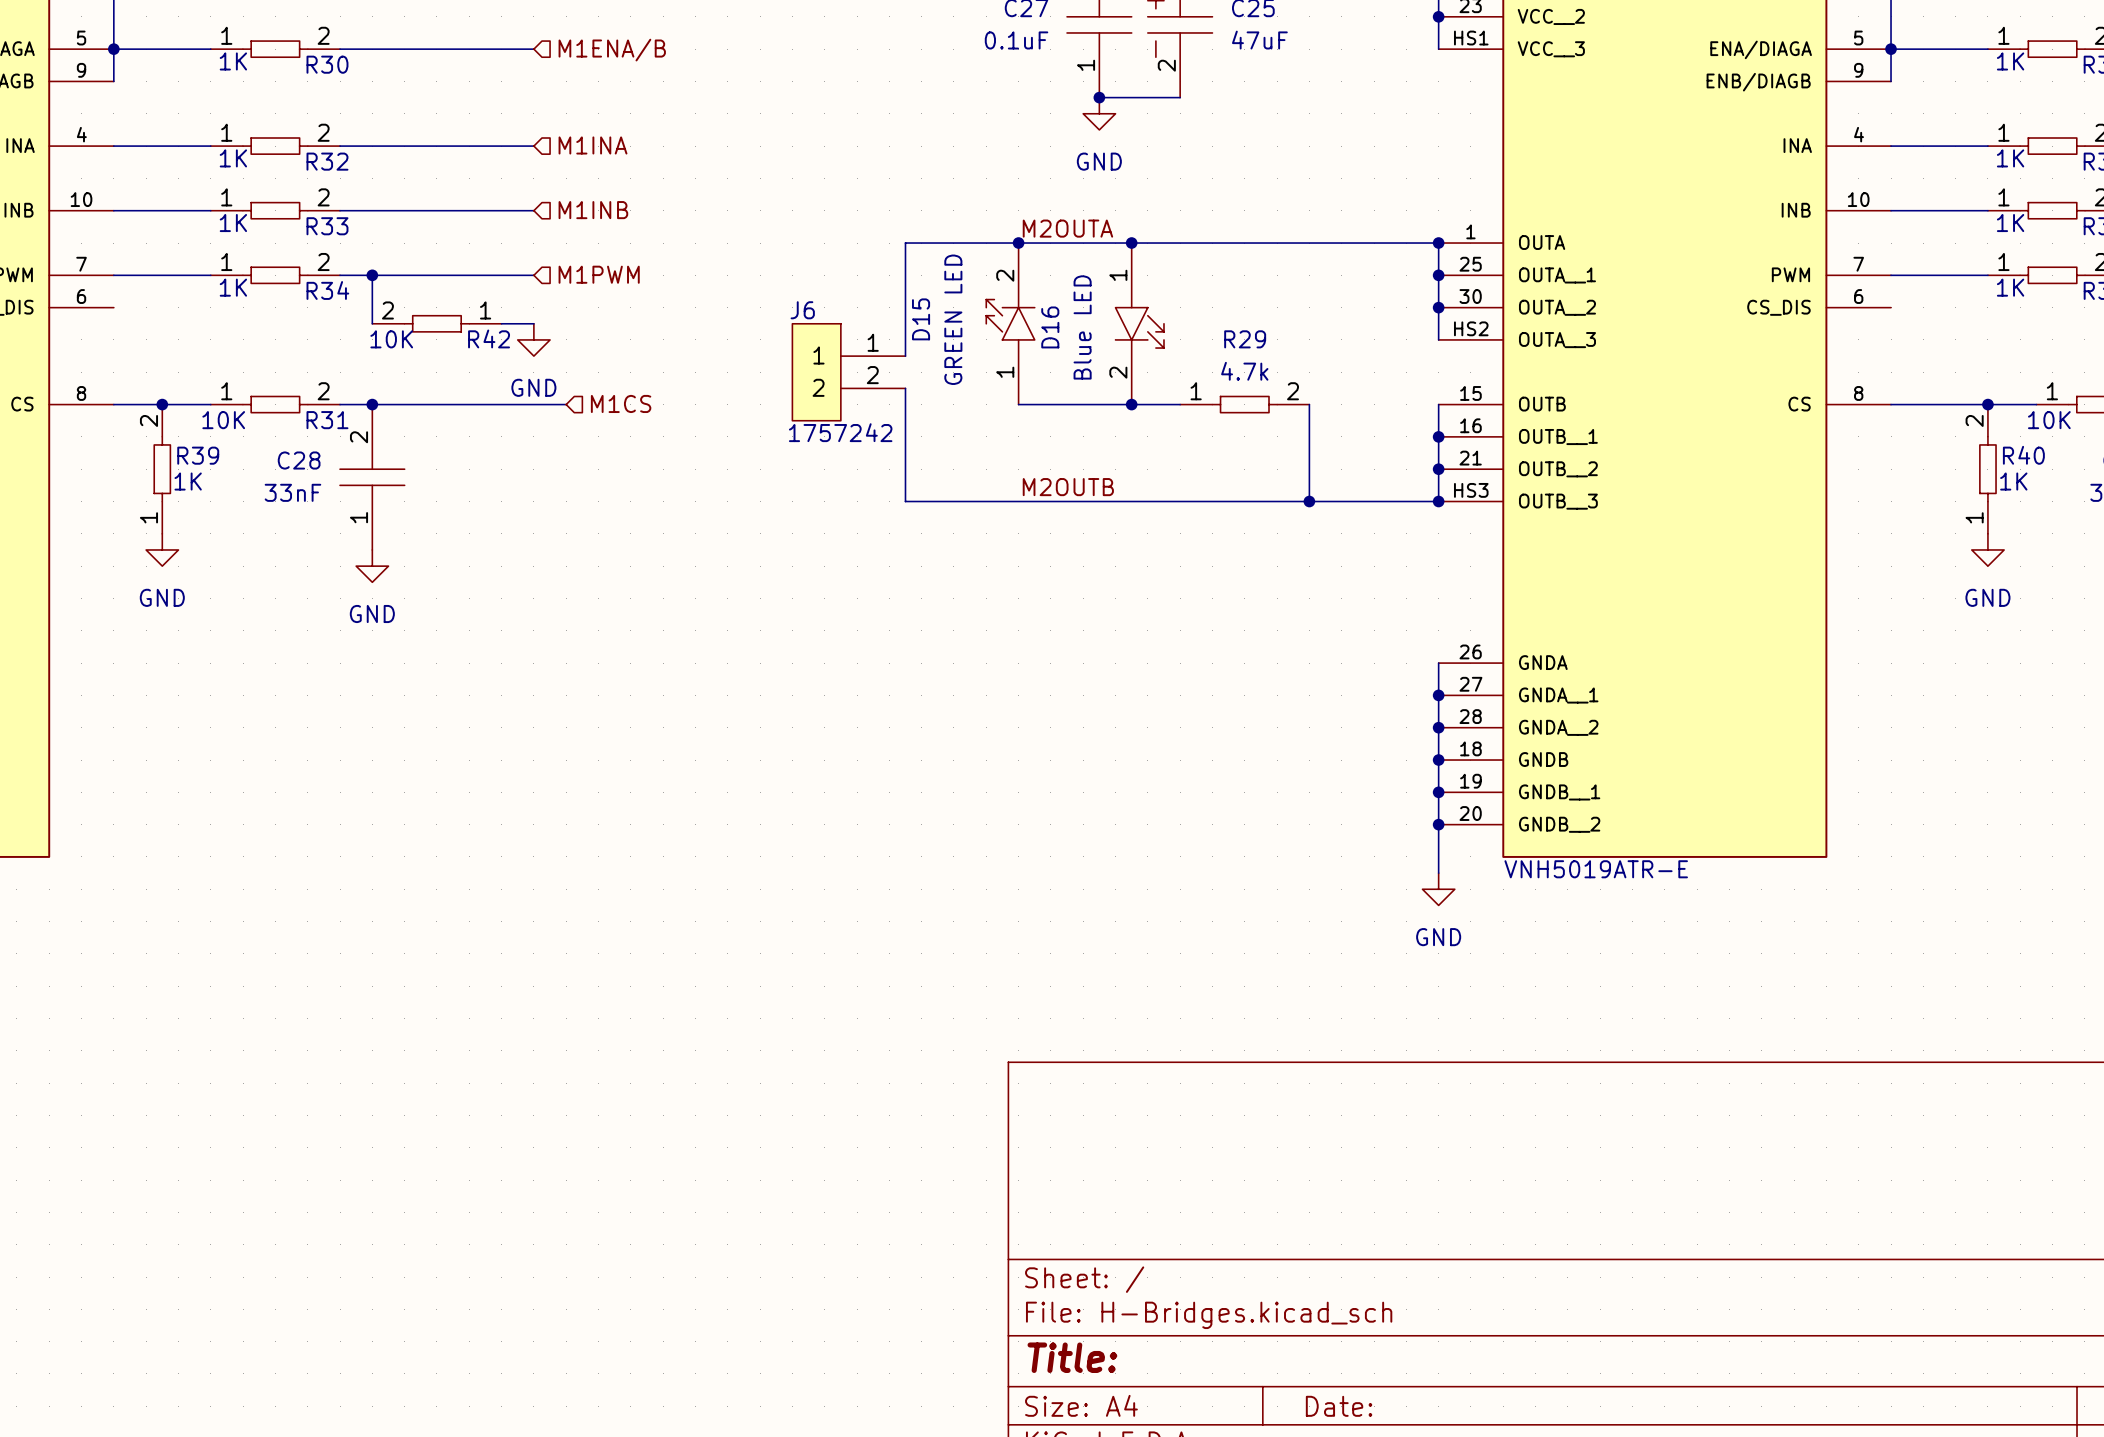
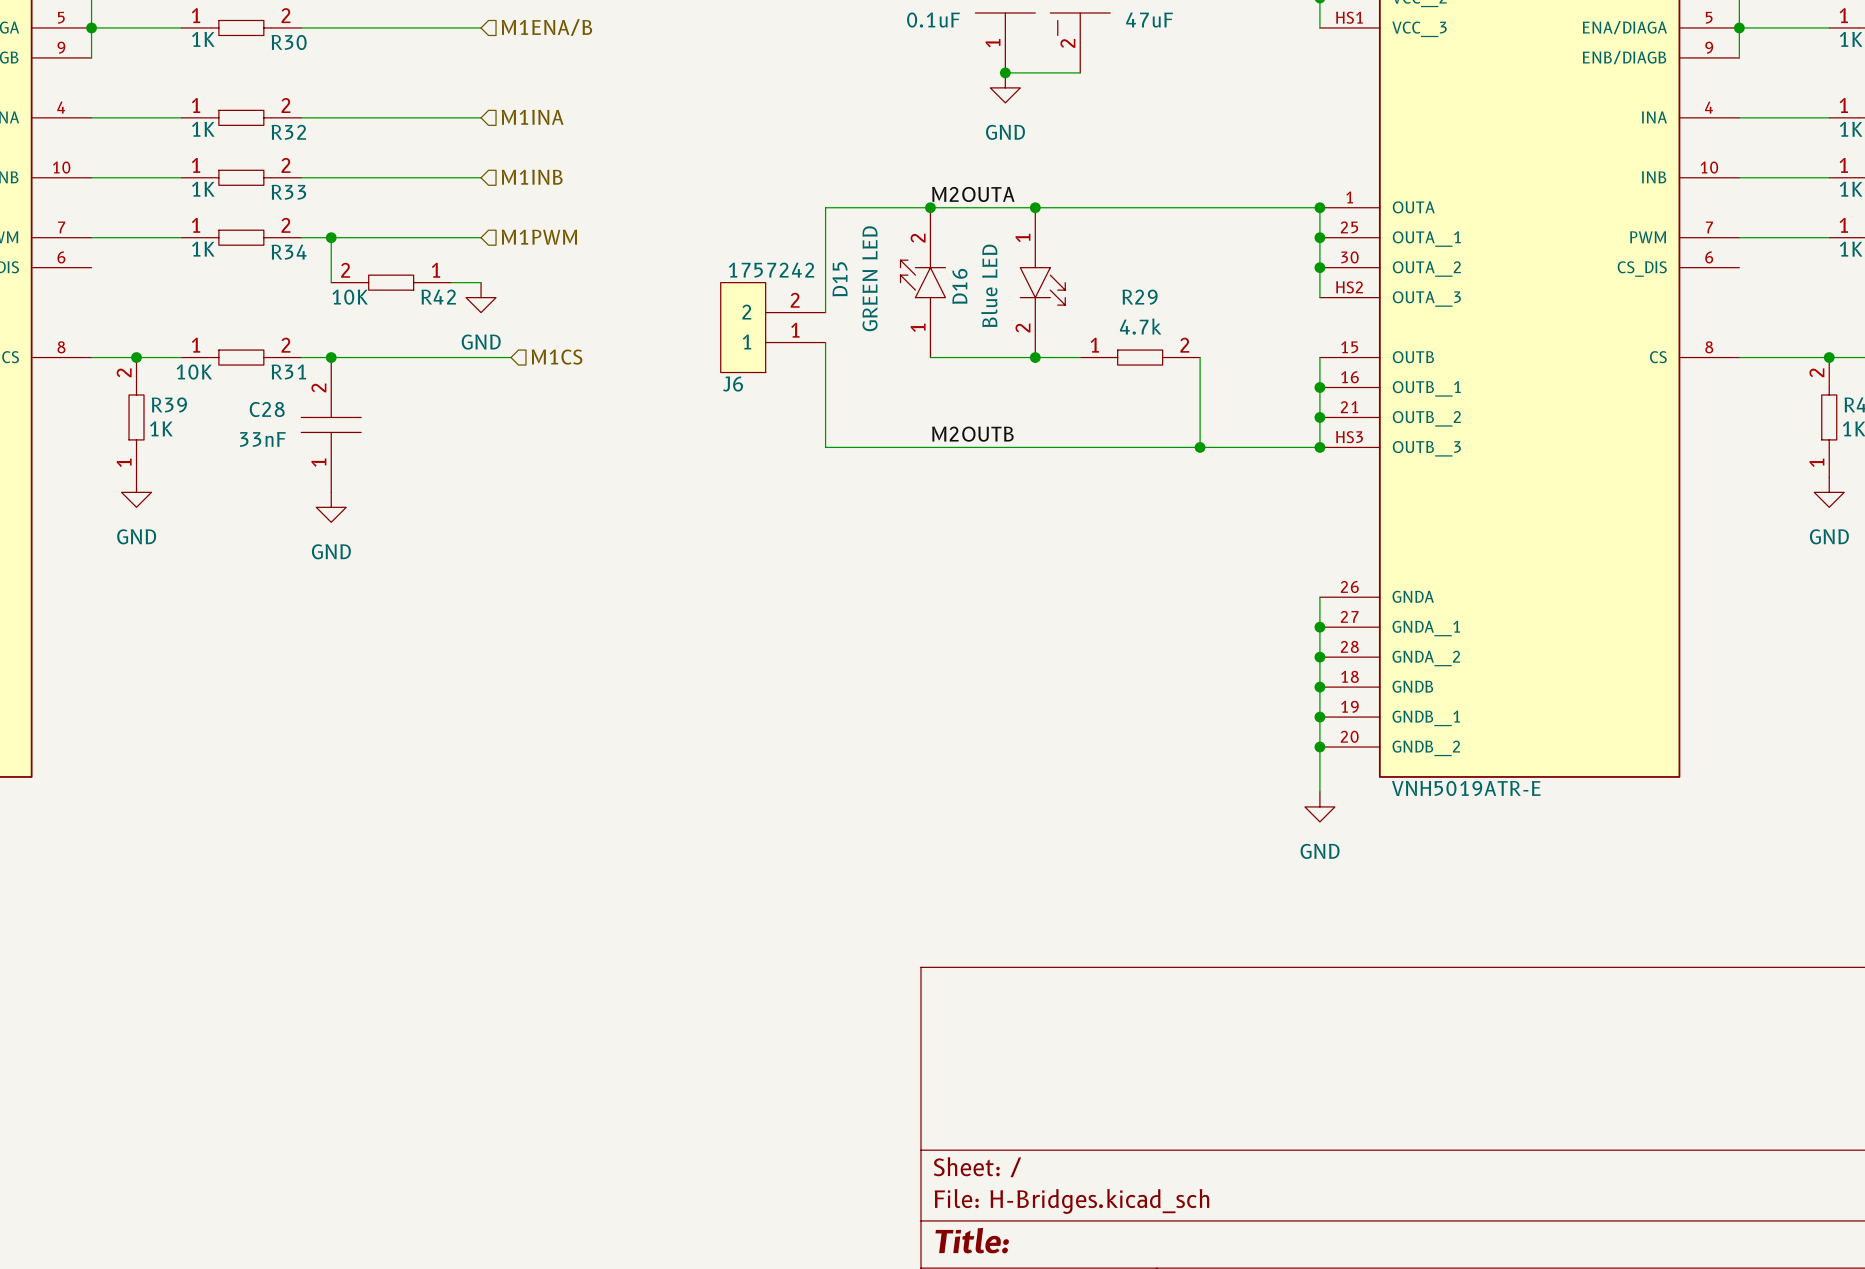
J6 flip: as is (816, 372) -> up-down (743, 327)

